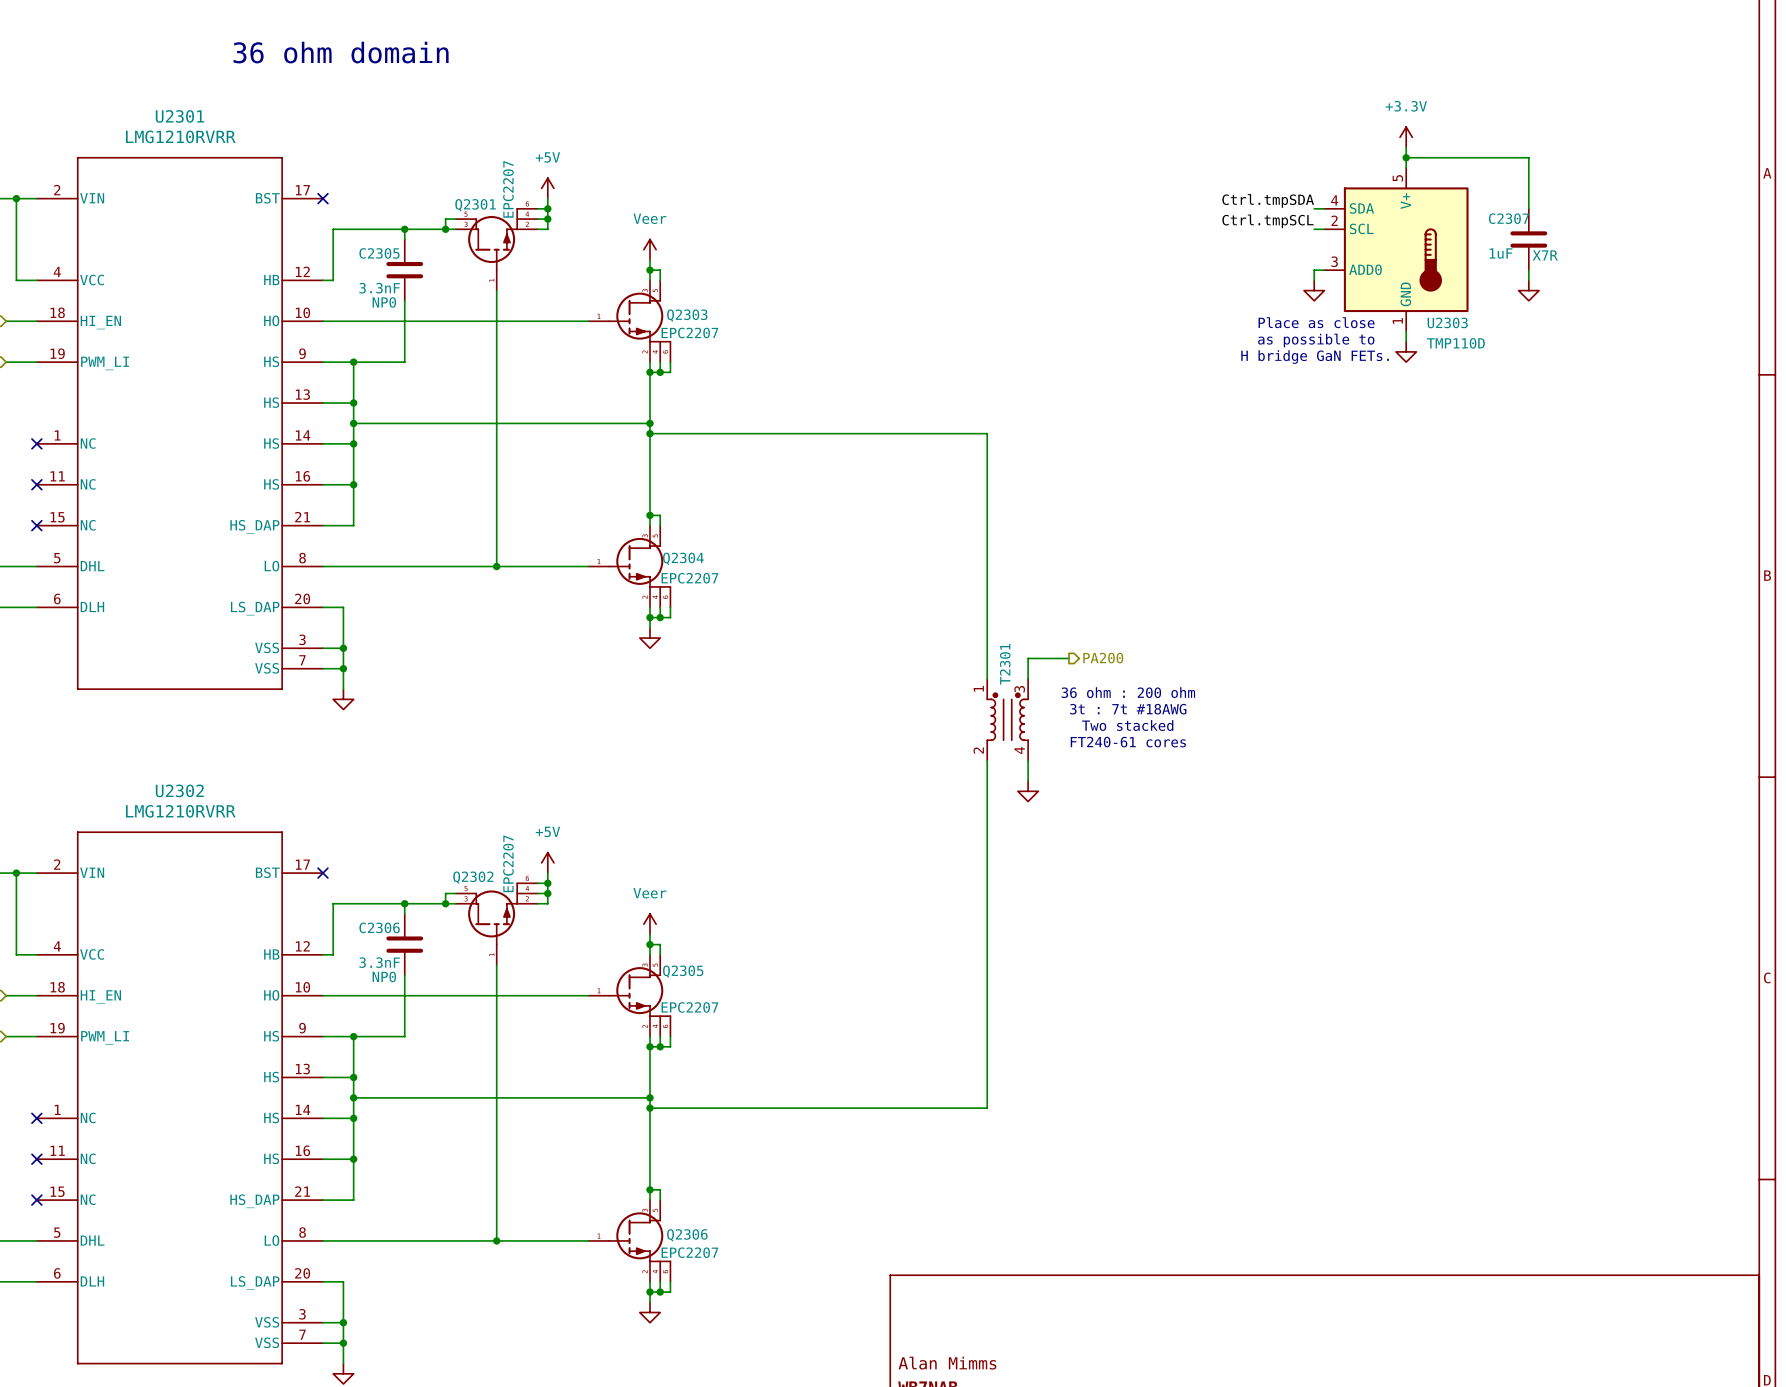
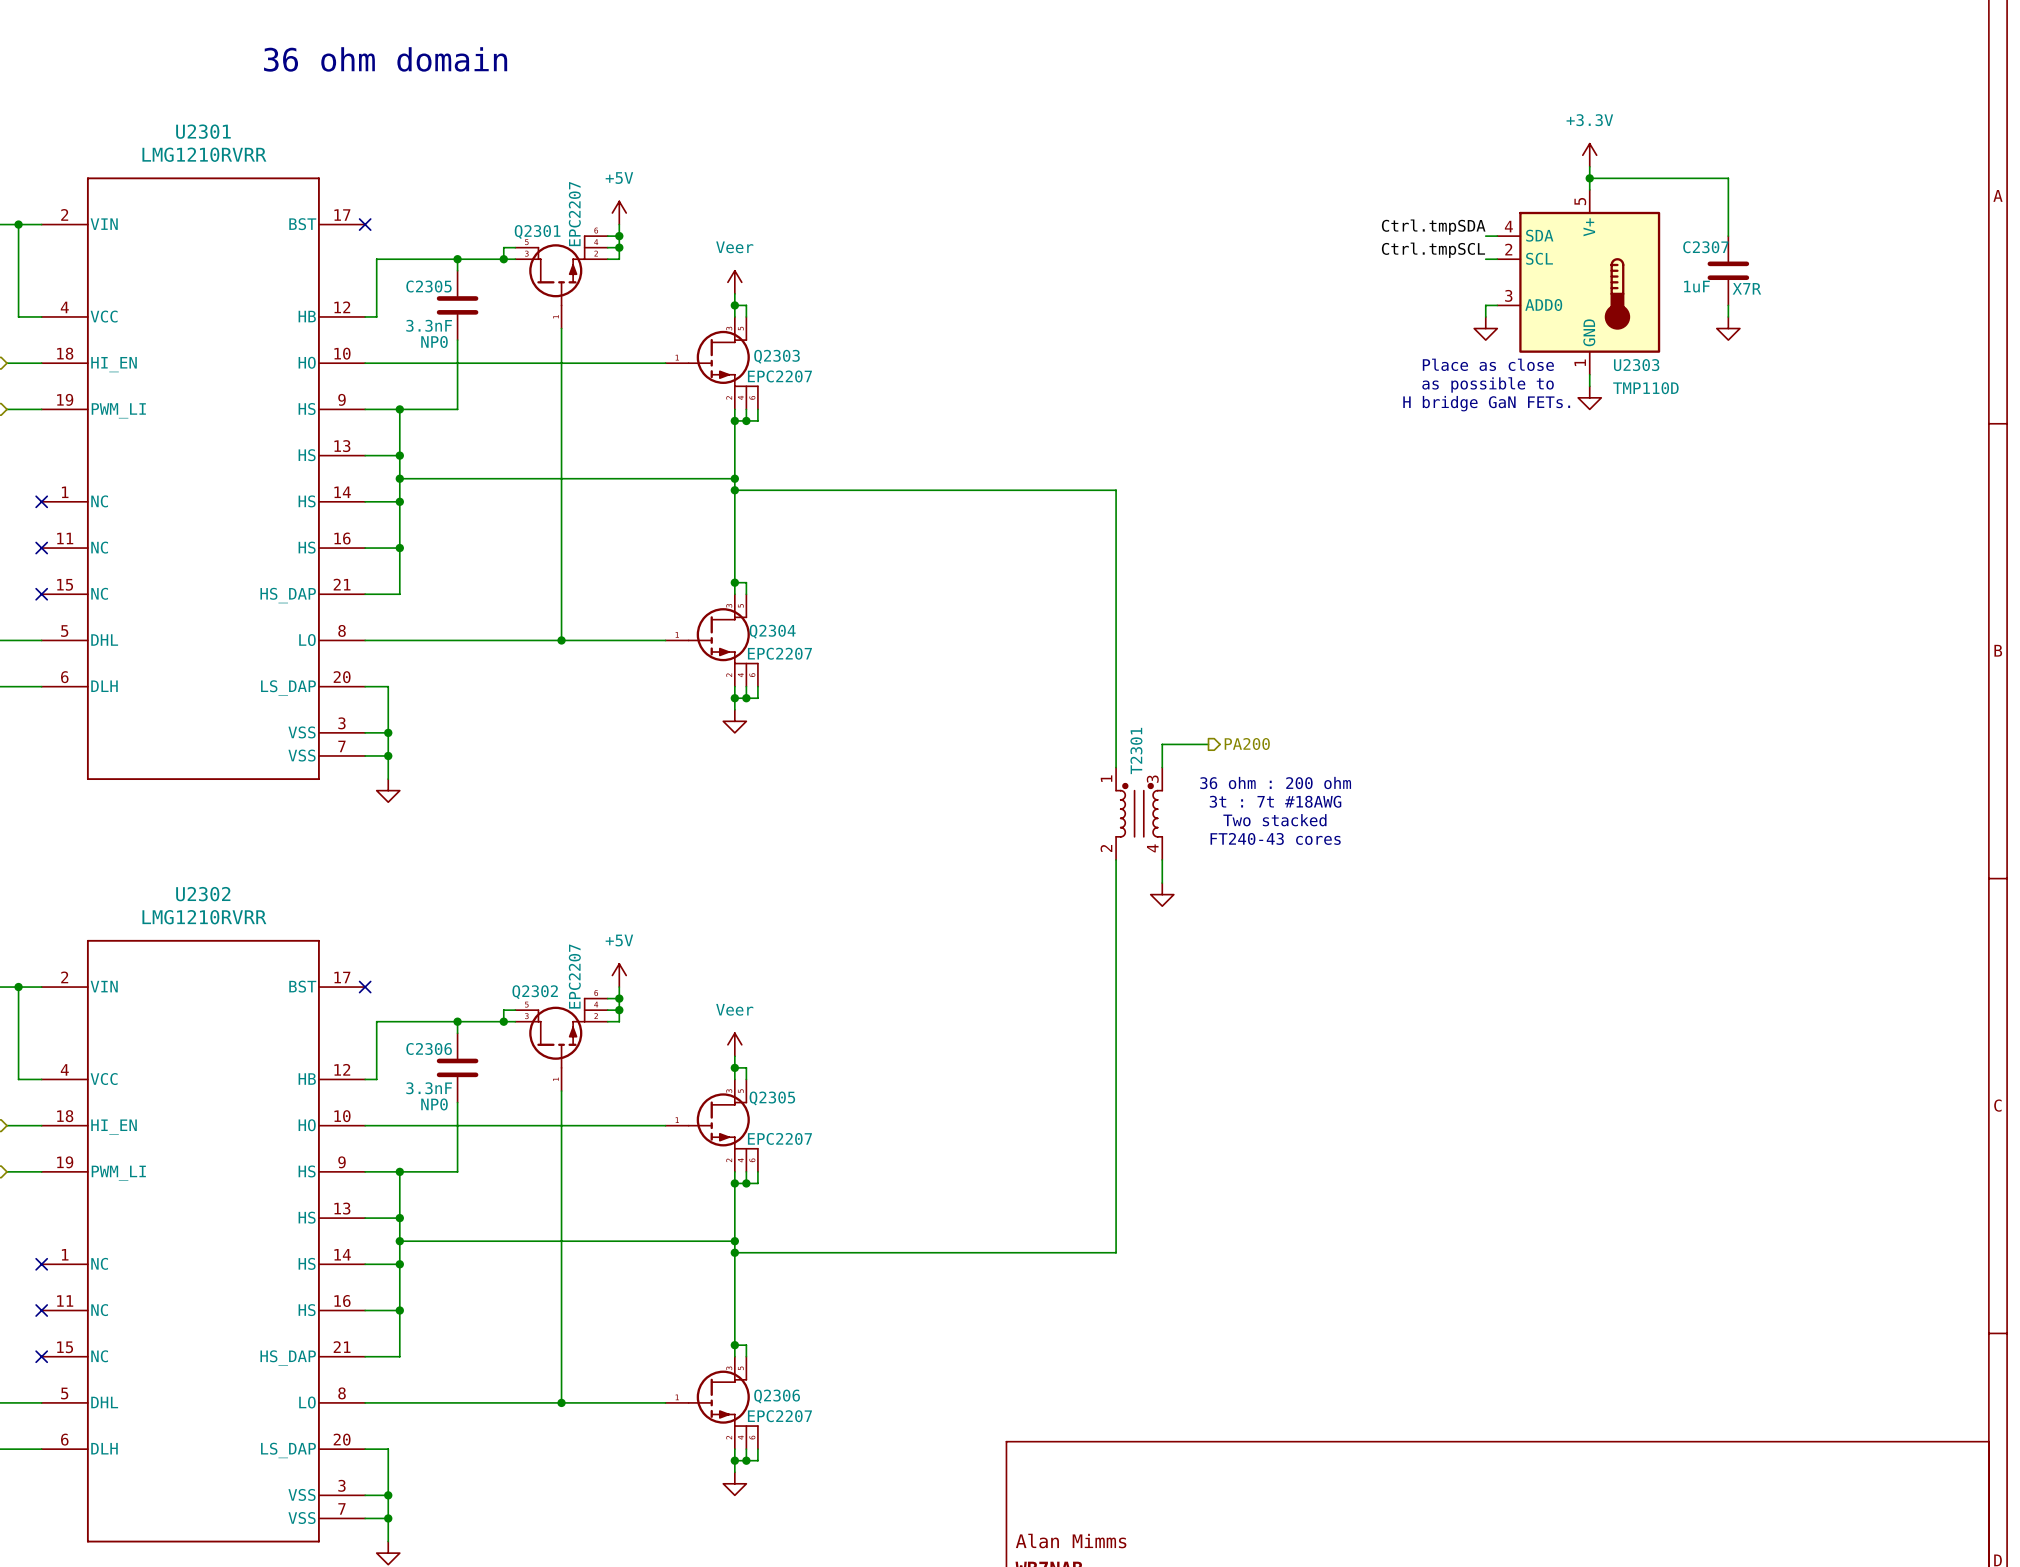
text: FT240-61 cores (1128, 742) -> FT240-43 cores (1275, 838)

